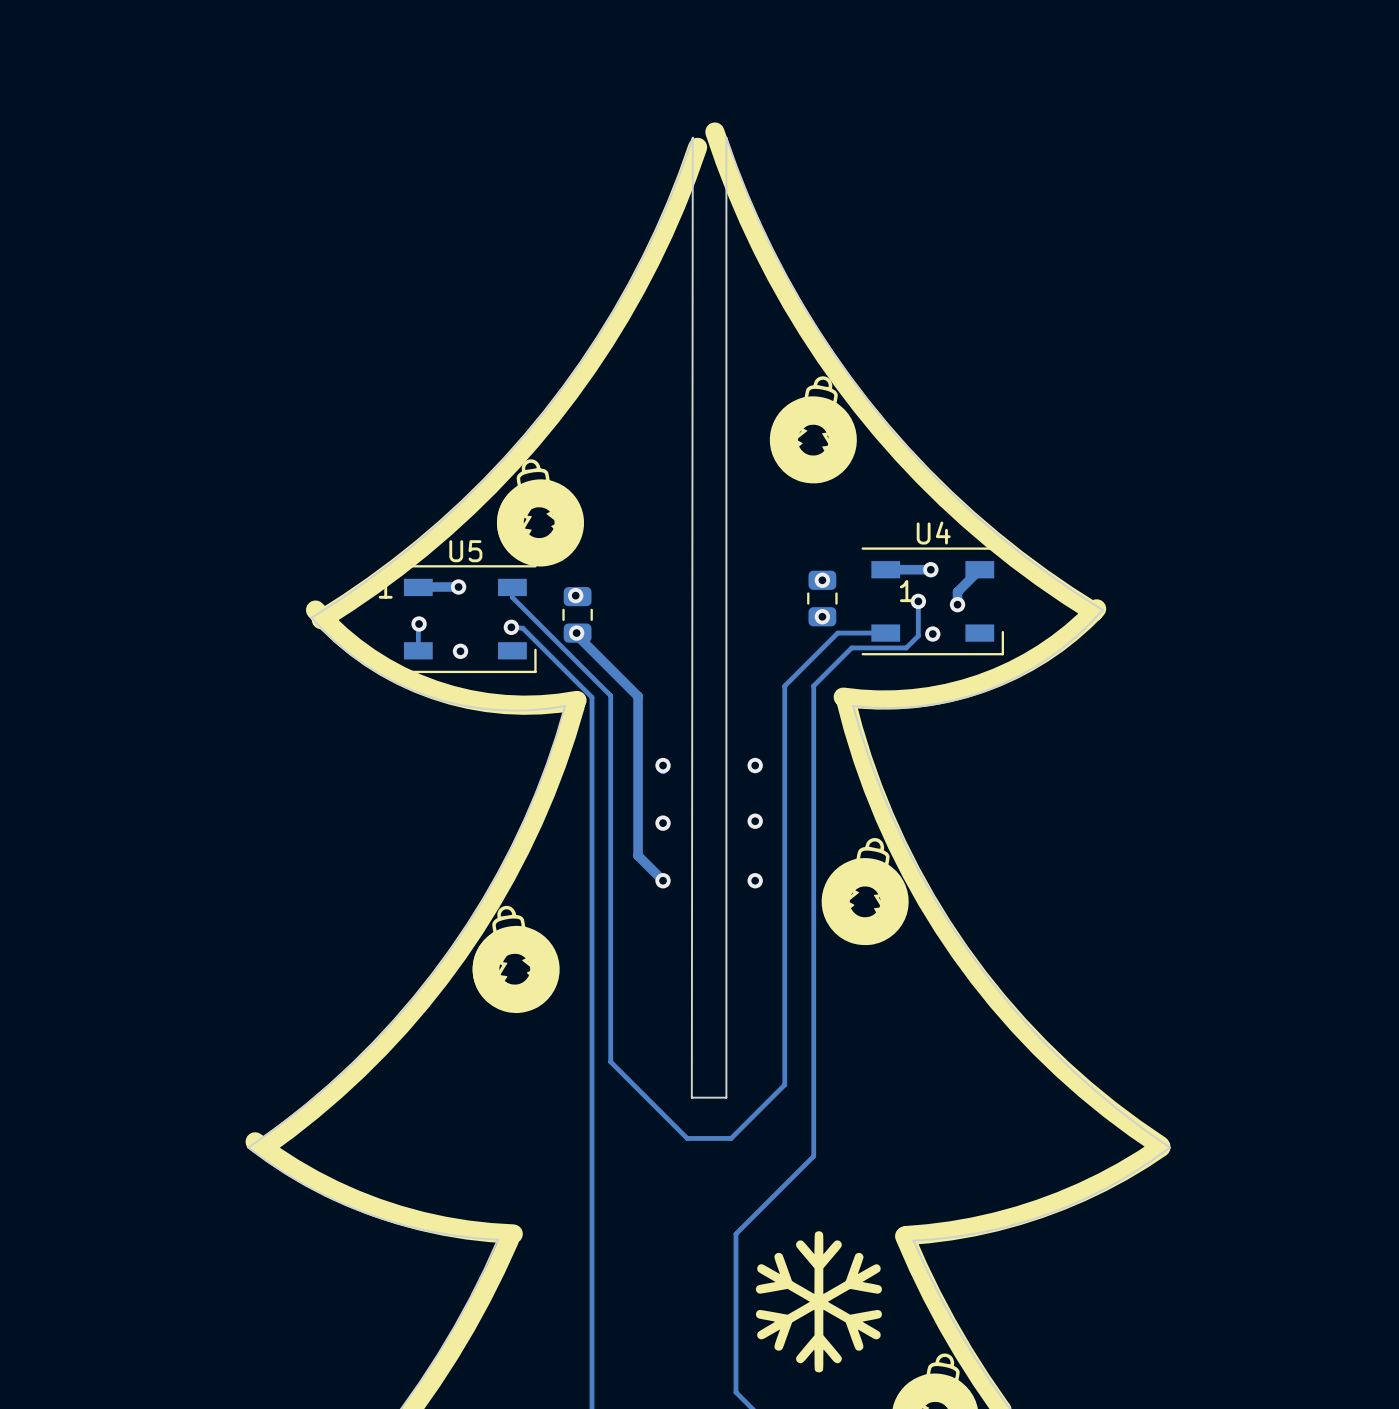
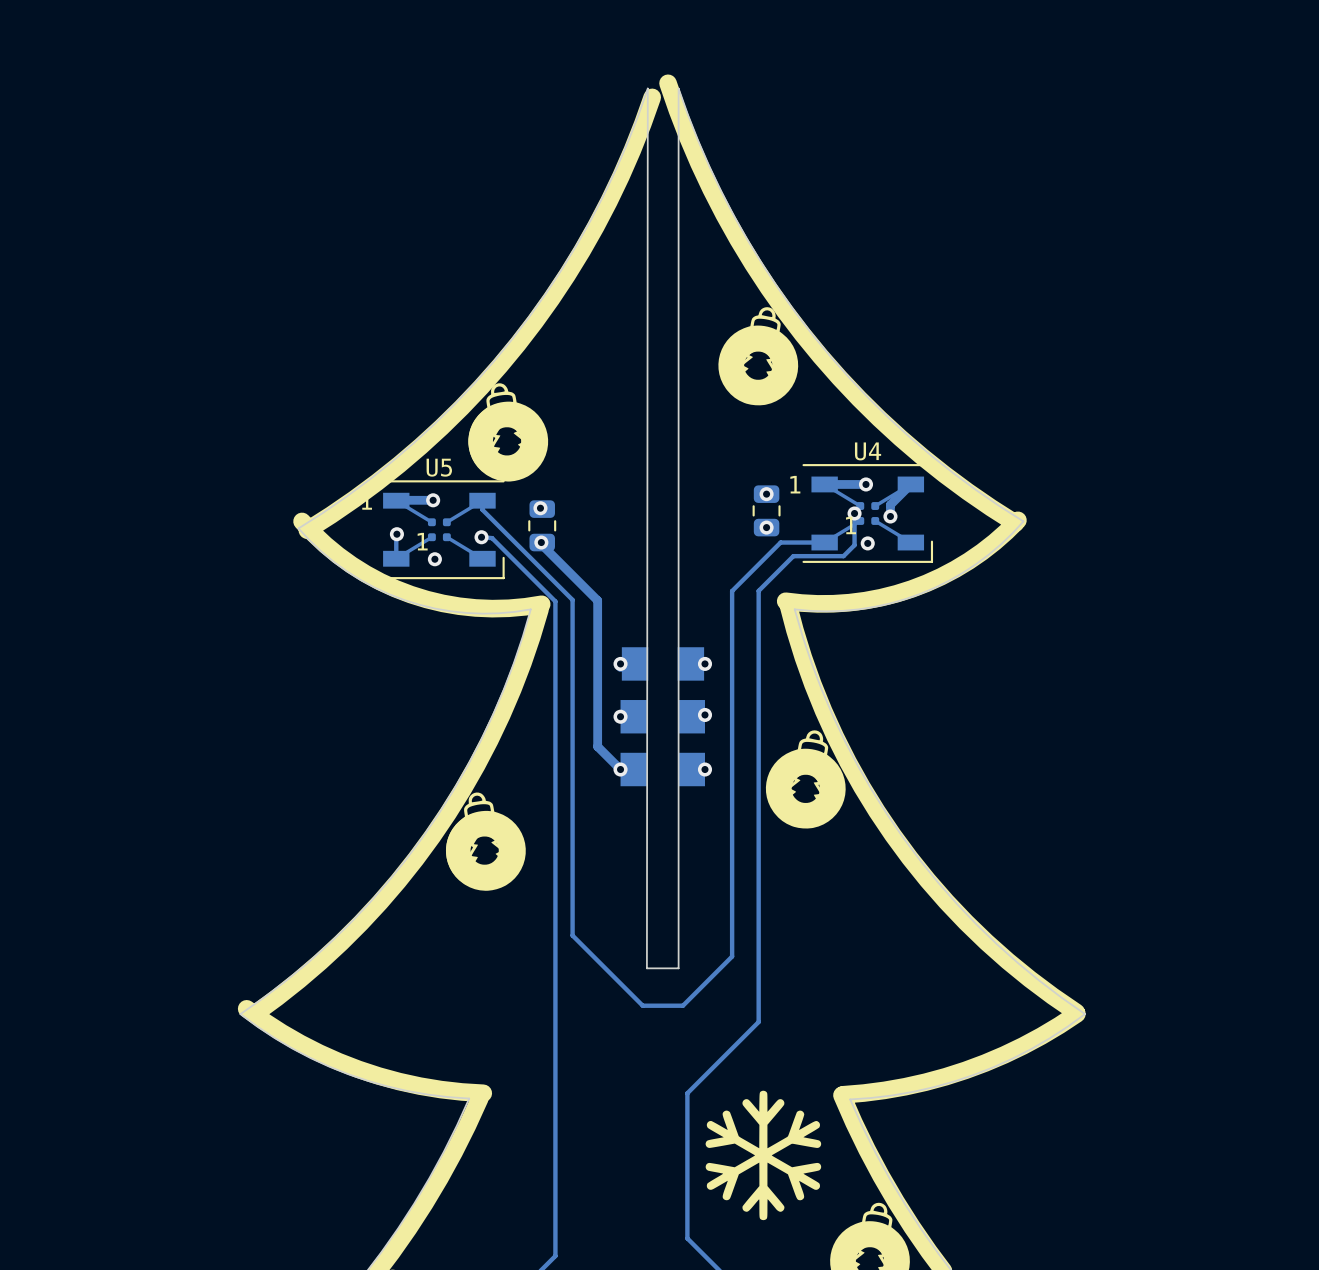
U4 footprint: [861, 547, 1005, 656] -> [802, 464, 934, 563]
U5 footprint: [394, 565, 537, 674] -> [374, 480, 505, 580]
part: none -> (635, 663)
part: none -> (690, 663)
part: none -> (633, 716)
part: none -> (691, 716)
part: none -> (633, 769)
part: none -> (691, 769)

